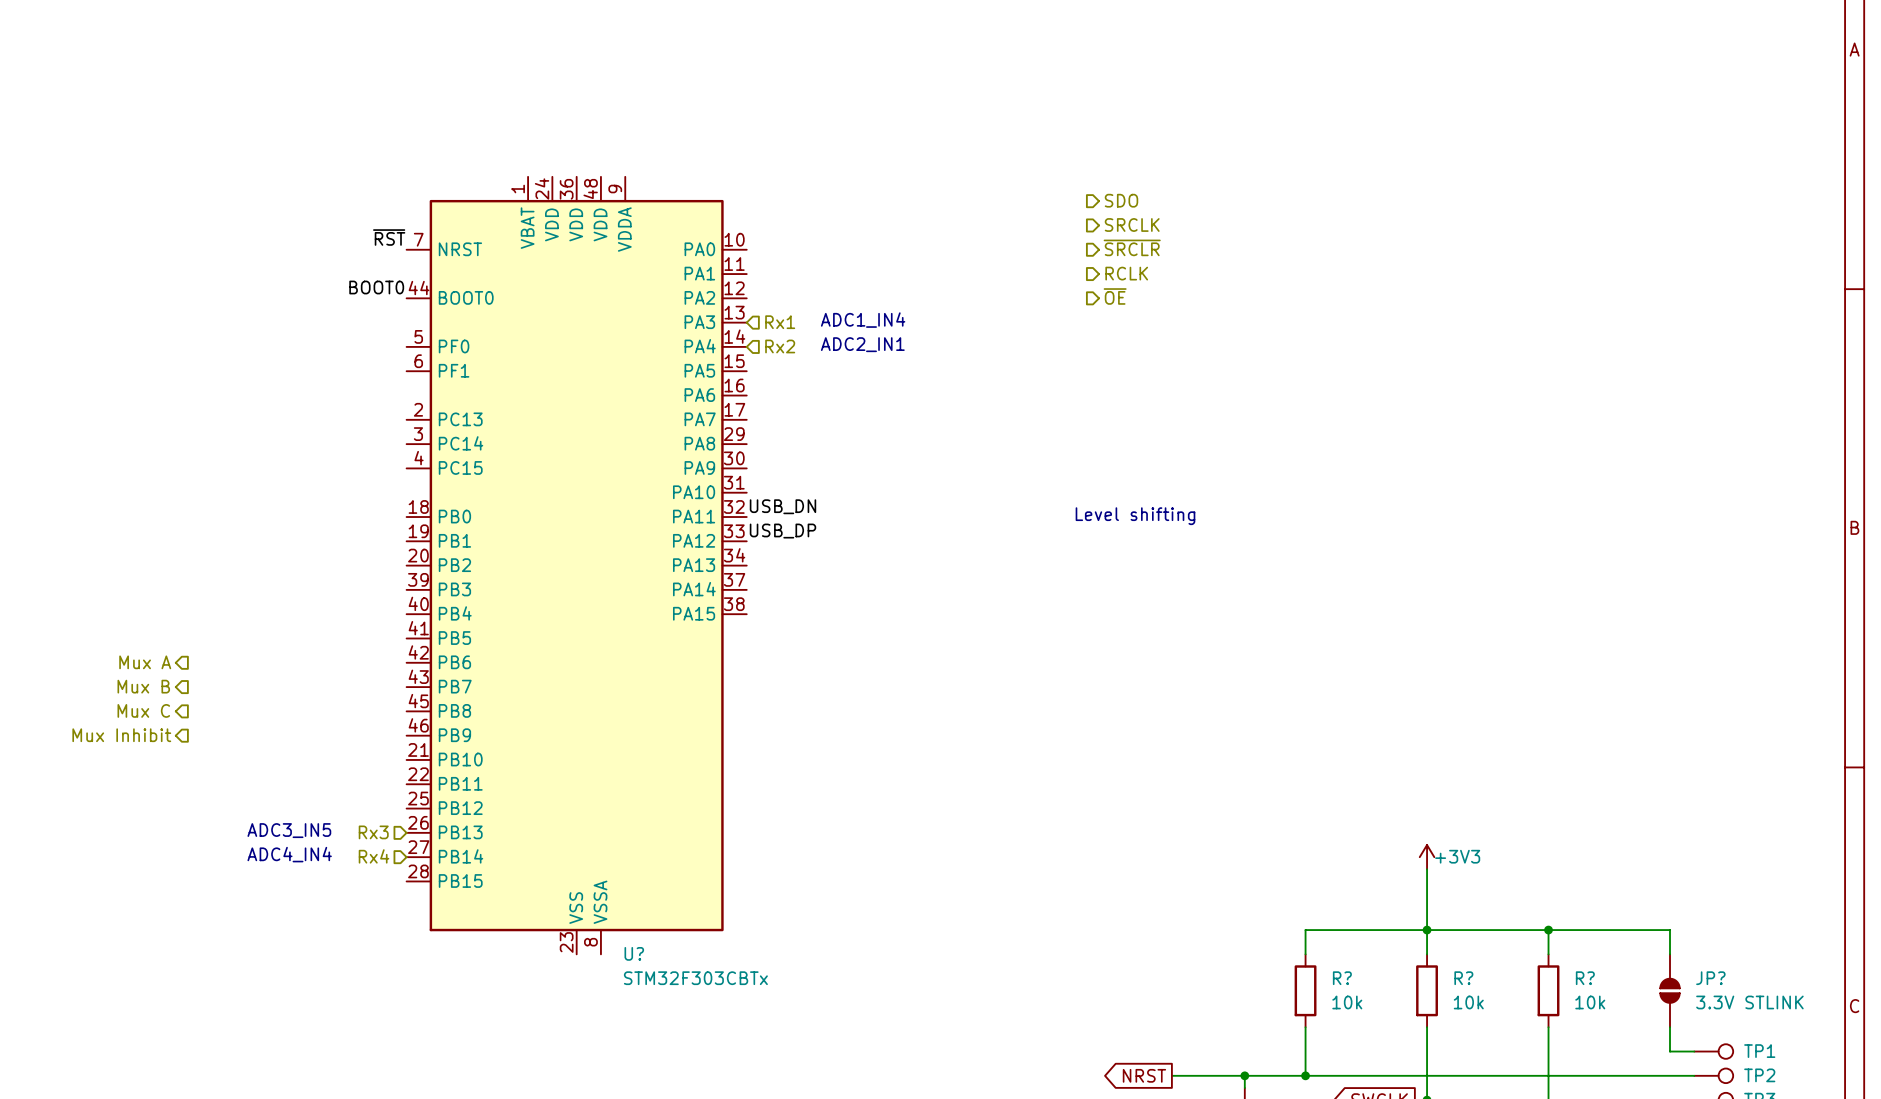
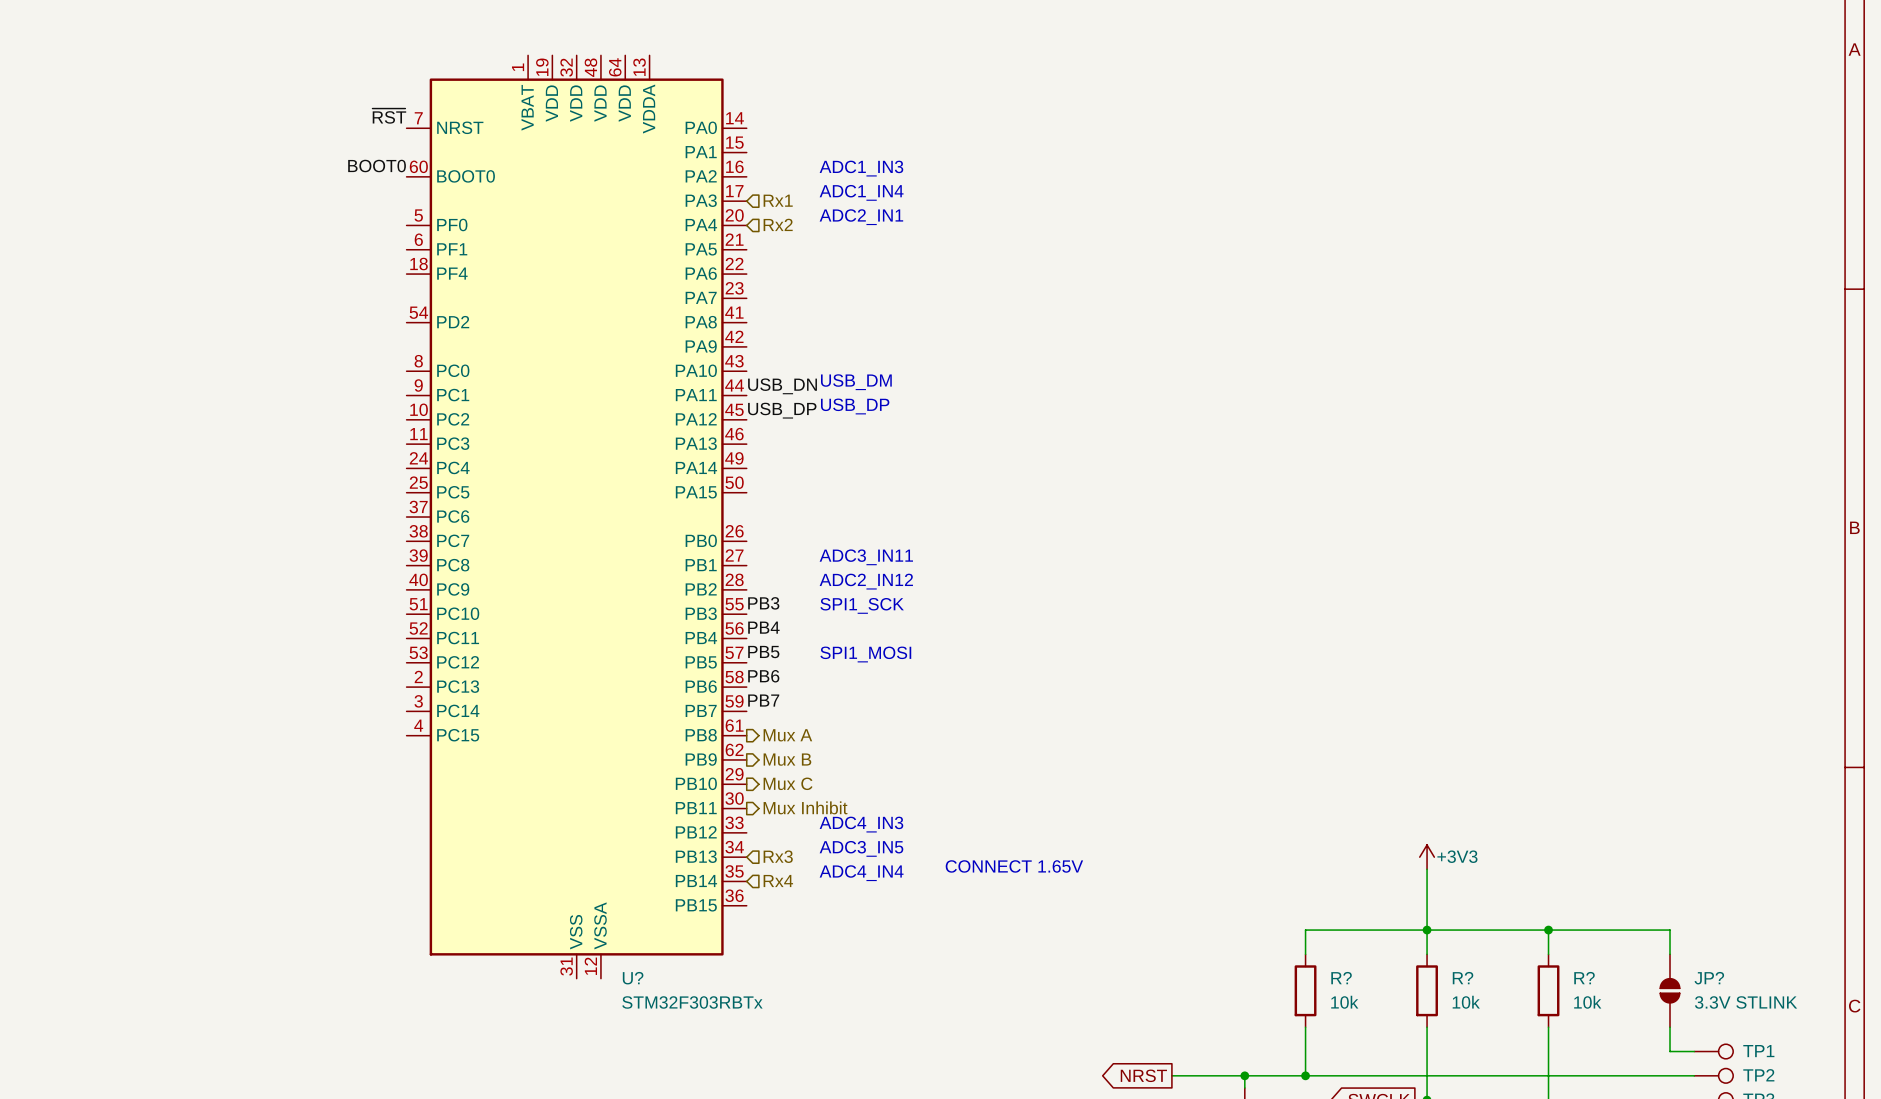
text: none -> ADC1_IN3 (861, 168)
hierarchical label: SDO (1121, 200) -> none
hierarchical label: SRCLK (1132, 225) -> none
label position: ~{RST} (389, 237) -> ~{RST} (389, 116)
hierarchical label: ~{SRCLR} (1132, 247) -> none
hierarchical label: RCLK (1126, 273) -> none
label position: BOOT0 (376, 287) -> BOOT0 (377, 166)
hierarchical label: ~{OE} (1115, 296) -> none
text position: ADC1_IN4 (863, 320) -> ADC1_IN4 (861, 192)
hierarchical label position: Rx1 (780, 322) -> Rx1 (778, 200)
text position: ADC2_IN1 (862, 344) -> ADC2_IN1 (861, 217)
hierarchical label position: Rx2 (780, 346) -> Rx2 (778, 224)
text: none -> USB_DM (856, 382)
text: none -> USB_DP (855, 406)
label position: USB_DN (782, 506) -> USB_DN (782, 386)
text: Level shifting (1135, 516) -> none
U?: none -> STM32F303RBTx (576, 517)
label position: USB_DP (782, 531) -> USB_DP (782, 410)
text: none -> ADC3_IN11 (866, 557)
U?: STM32F303CBTx (576, 565) -> none
text: none -> ADC2_IN12 (866, 581)
label: none -> PB3 (763, 603)
text: none -> SPI1_SCK (862, 605)
label: none -> PB4 (763, 627)
label: none -> PB5 (763, 652)
text: none -> SPI1_MOSI (865, 654)
hierarchical label: Mux A (145, 662) -> none
label: none -> PB6 (763, 676)
hierarchical label: Mux B (143, 686) -> none
label: none -> PB7 (763, 700)
hierarchical label: Mux C (143, 710) -> none
hierarchical label: Mux Inhibit (121, 735) -> none
hierarchical label: none -> Mux A (787, 735)
hierarchical label: none -> Mux B (787, 759)
hierarchical label: none -> Mux C (788, 783)
hierarchical label: none -> Mux Inhibit (805, 807)
text: none -> ADC4_IN3 (861, 824)
text: ADC3_IN5 (289, 830) -> none
hierarchical label: Rx3 (373, 832) -> none
text: none -> ADC3_IN5 (861, 848)
text: ADC4_IN4 (289, 854) -> none
hierarchical label: Rx4 (374, 856) -> none
hierarchical label: none -> Rx3 (778, 856)
text: none -> CONNECT 1.65V (1014, 866)
text: none -> ADC4_IN4 (861, 873)
hierarchical label: none -> Rx4 (778, 881)

